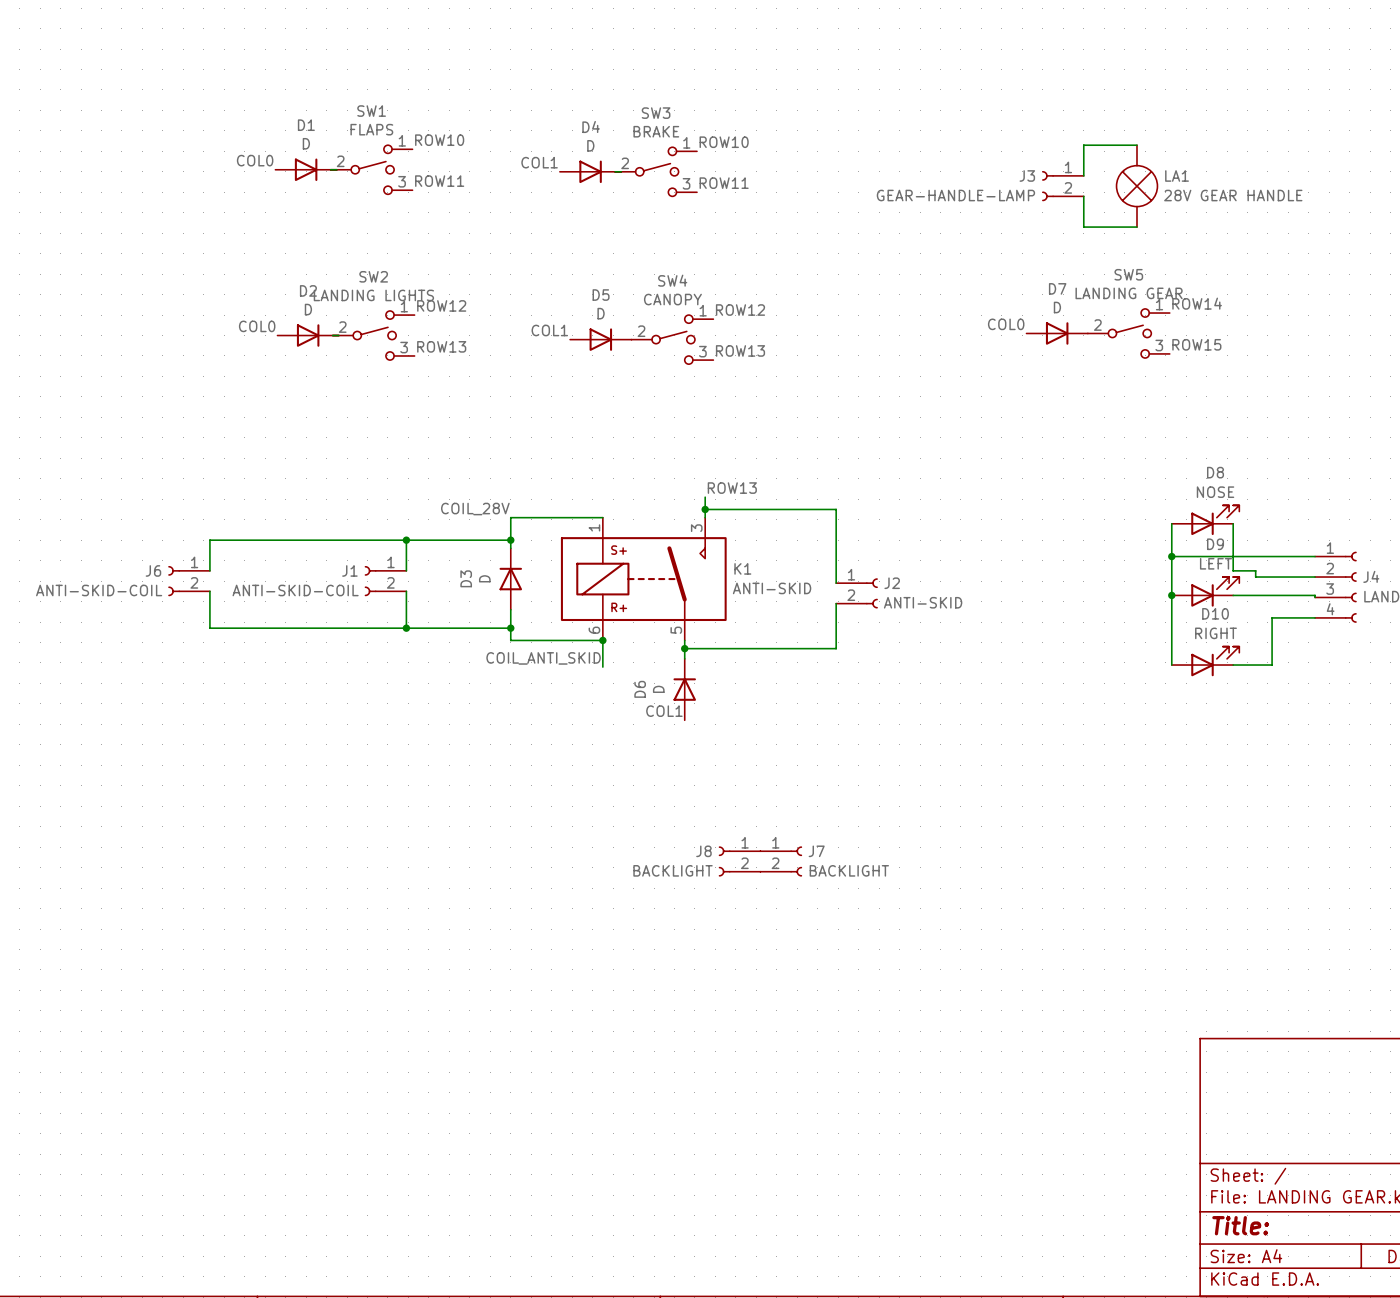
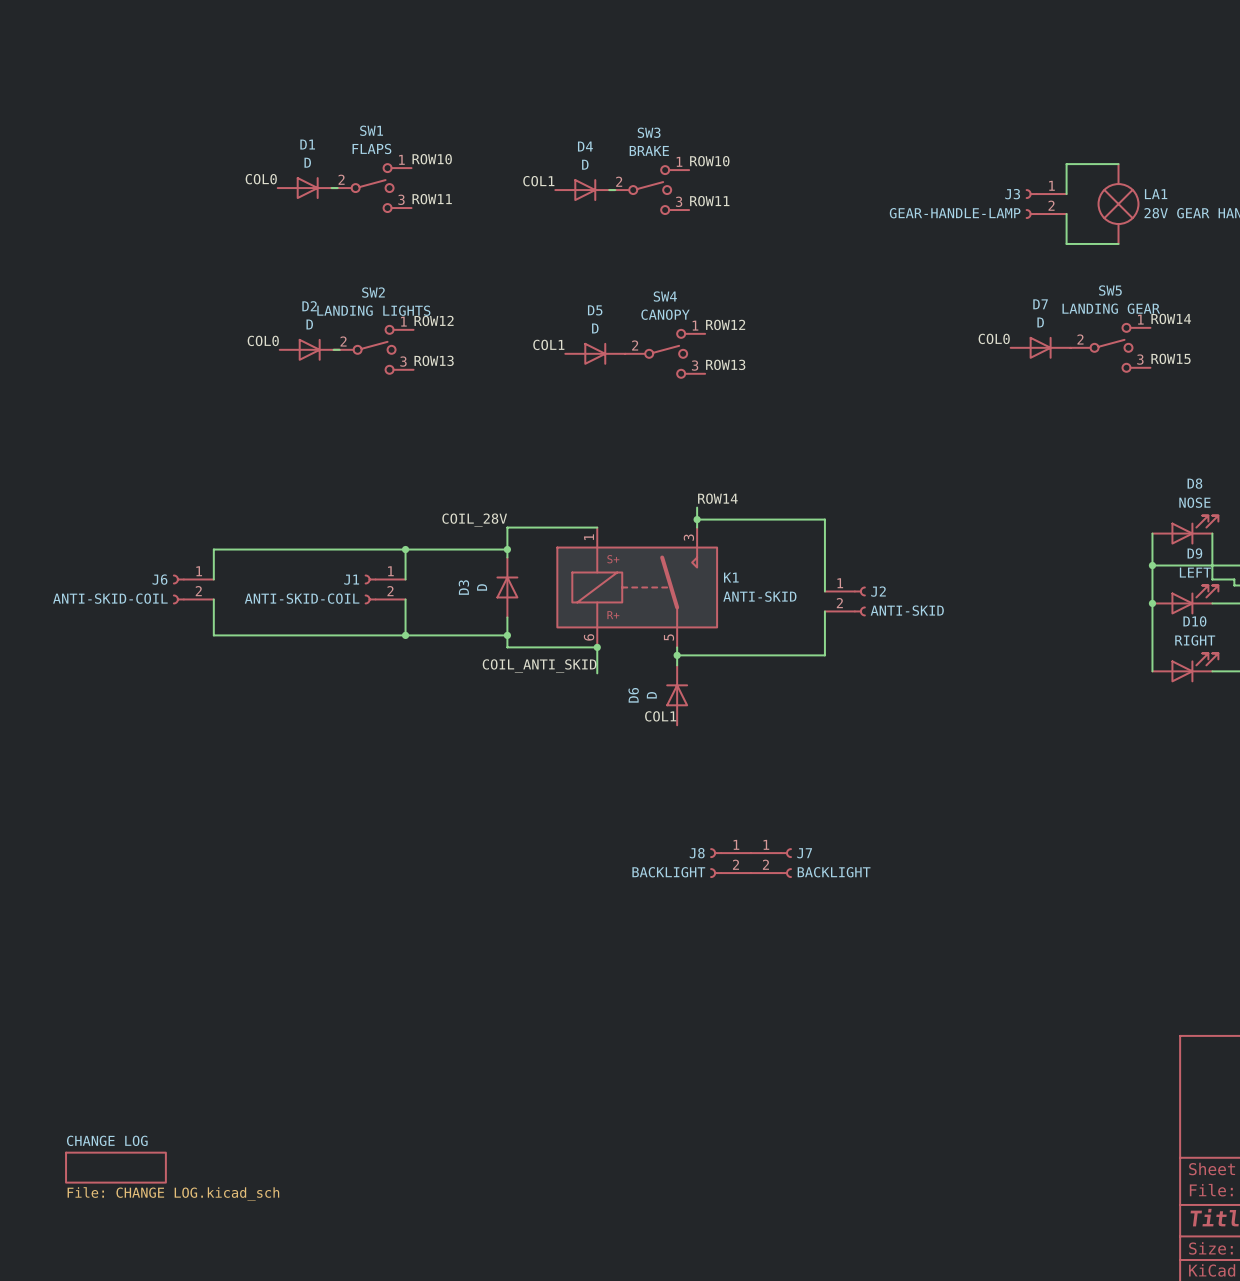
label: ROW13 (732, 488) -> ROW14 (717, 498)
sheet CHANGE LOG: none -> File: CHANGE LOG.kicad_sch (115, 1167)

